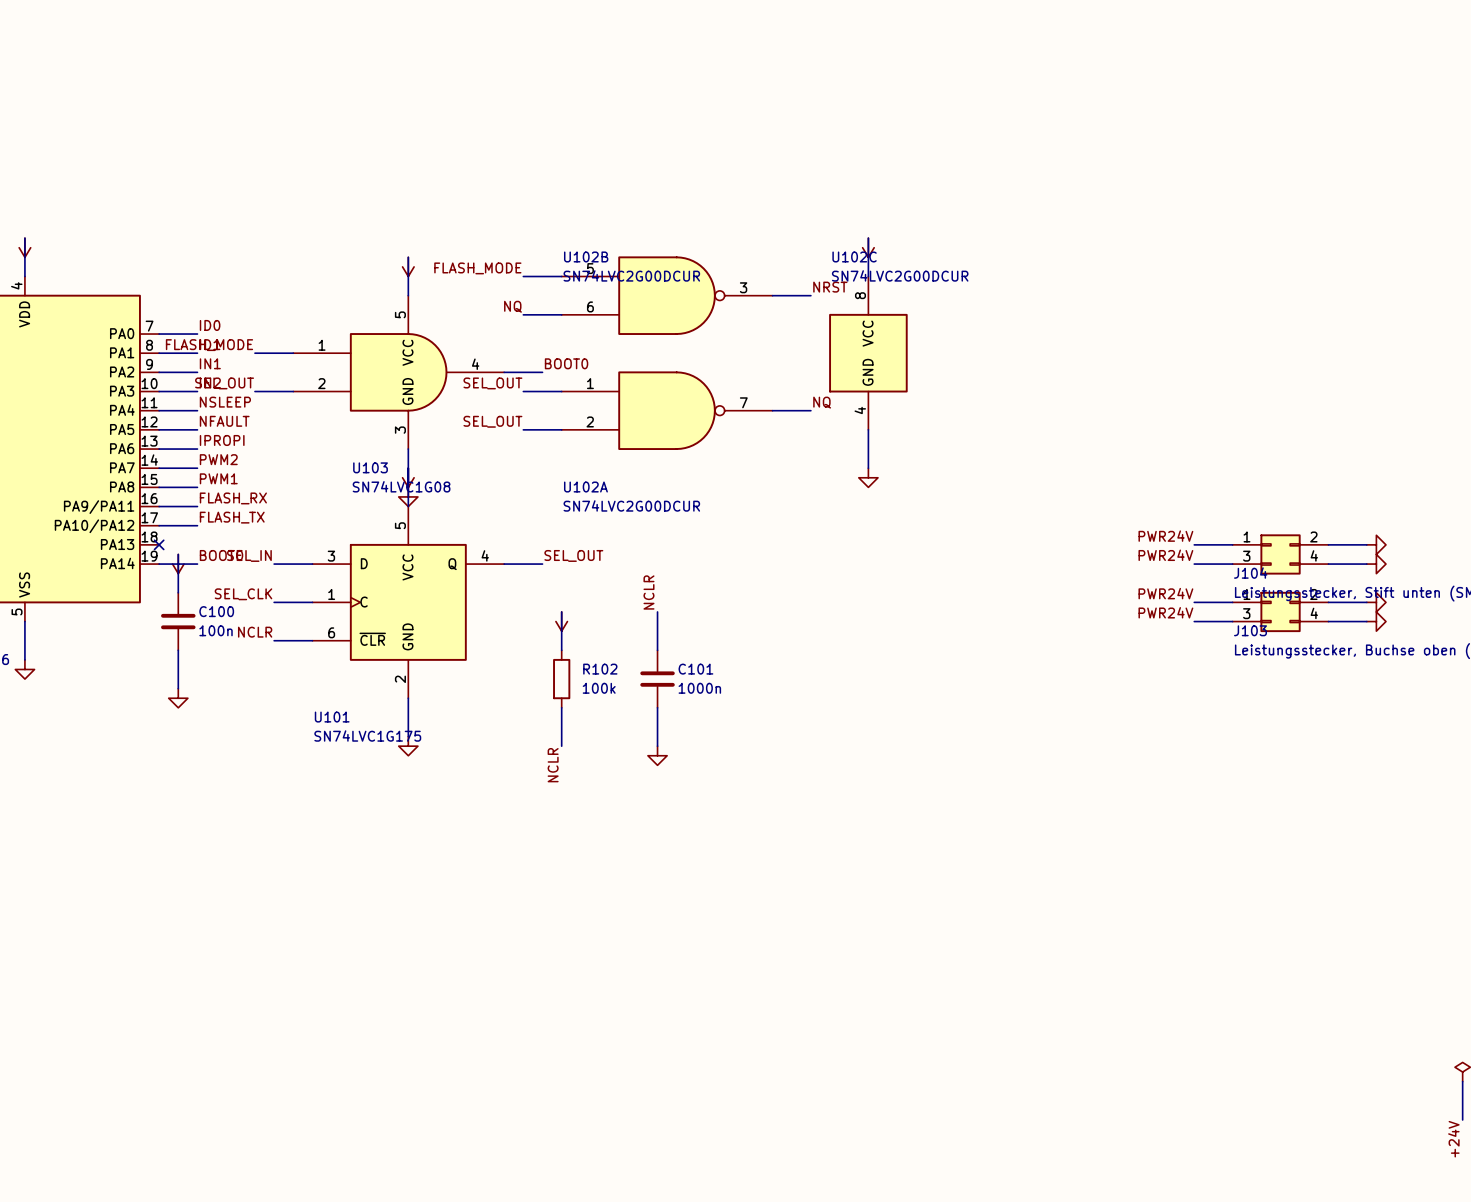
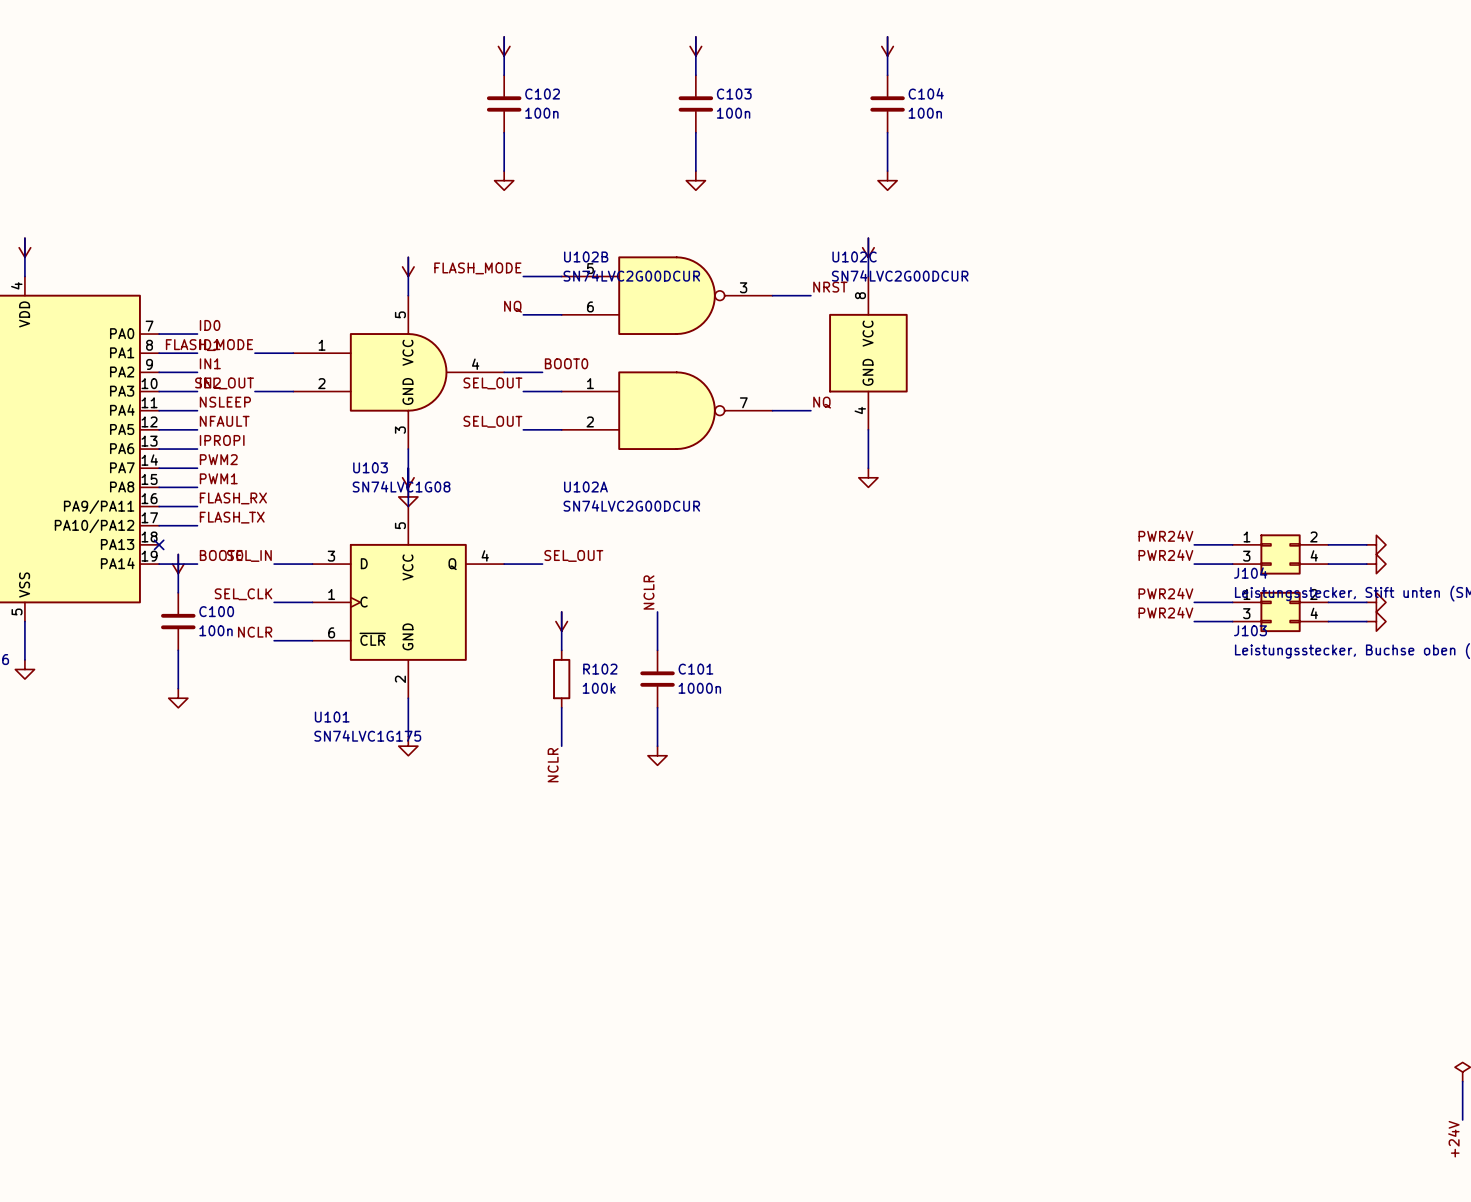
wire: none -> (504, 36) (504, 75)
wire: none -> (695, 36) (695, 75)
wire: none -> (887, 36) (887, 75)
power symbol: none -> (504, 46)
power symbol: none -> (695, 46)
power symbol: none -> (887, 46)
C102: none -> 100n (504, 103)
C103: none -> 100n (695, 103)
C104: none -> 100n (887, 103)
wire: none -> (504, 132) (504, 171)
wire: none -> (695, 132) (695, 171)
wire: none -> (887, 132) (887, 171)
power symbol: none -> (504, 180)
power symbol: none -> (695, 180)
power symbol: none -> (887, 180)

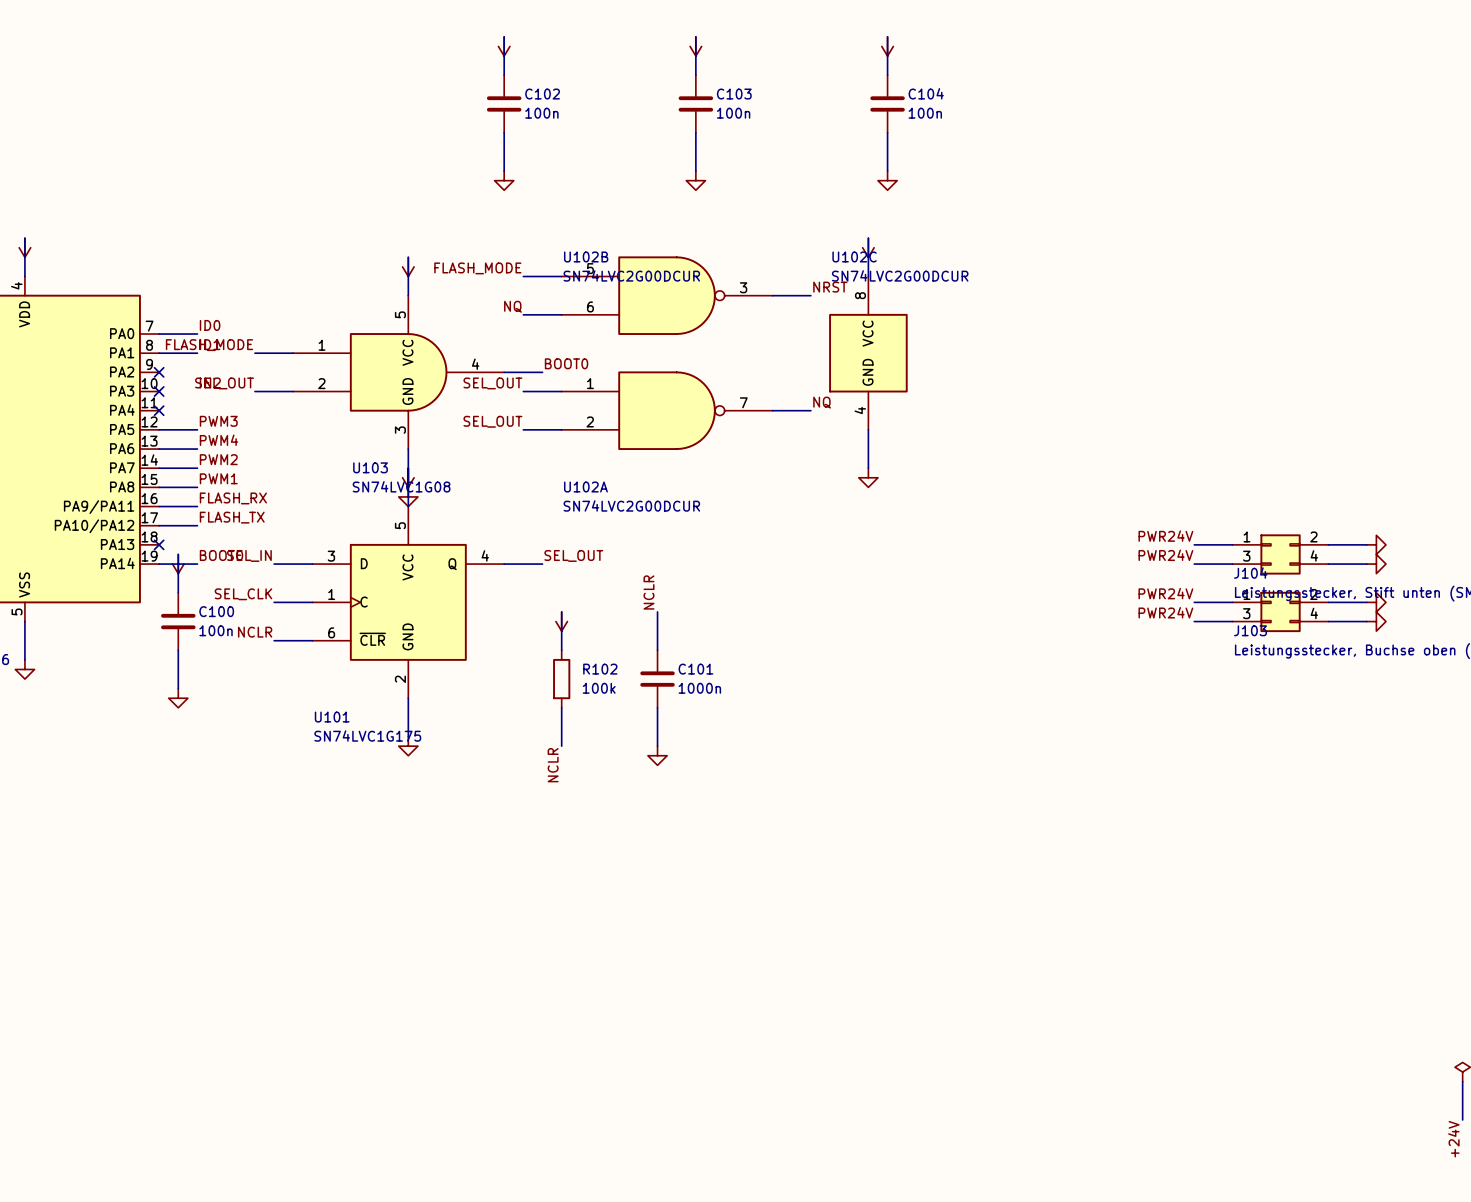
label: IN1 (210, 363) -> none
wire: (159, 372) (197, 372) -> none
no-connect mark: none -> (159, 372)
wire: (159, 391) (197, 391) -> none
no-connect mark: none -> (159, 391)
label: NSLEEP (225, 402) -> none
wire: (159, 410) (197, 410) -> none
no-connect mark: none -> (159, 410)
label: NFAULT (224, 421) -> PWM3 (218, 421)
label: IPROPI (222, 440) -> PWM4 (218, 440)

